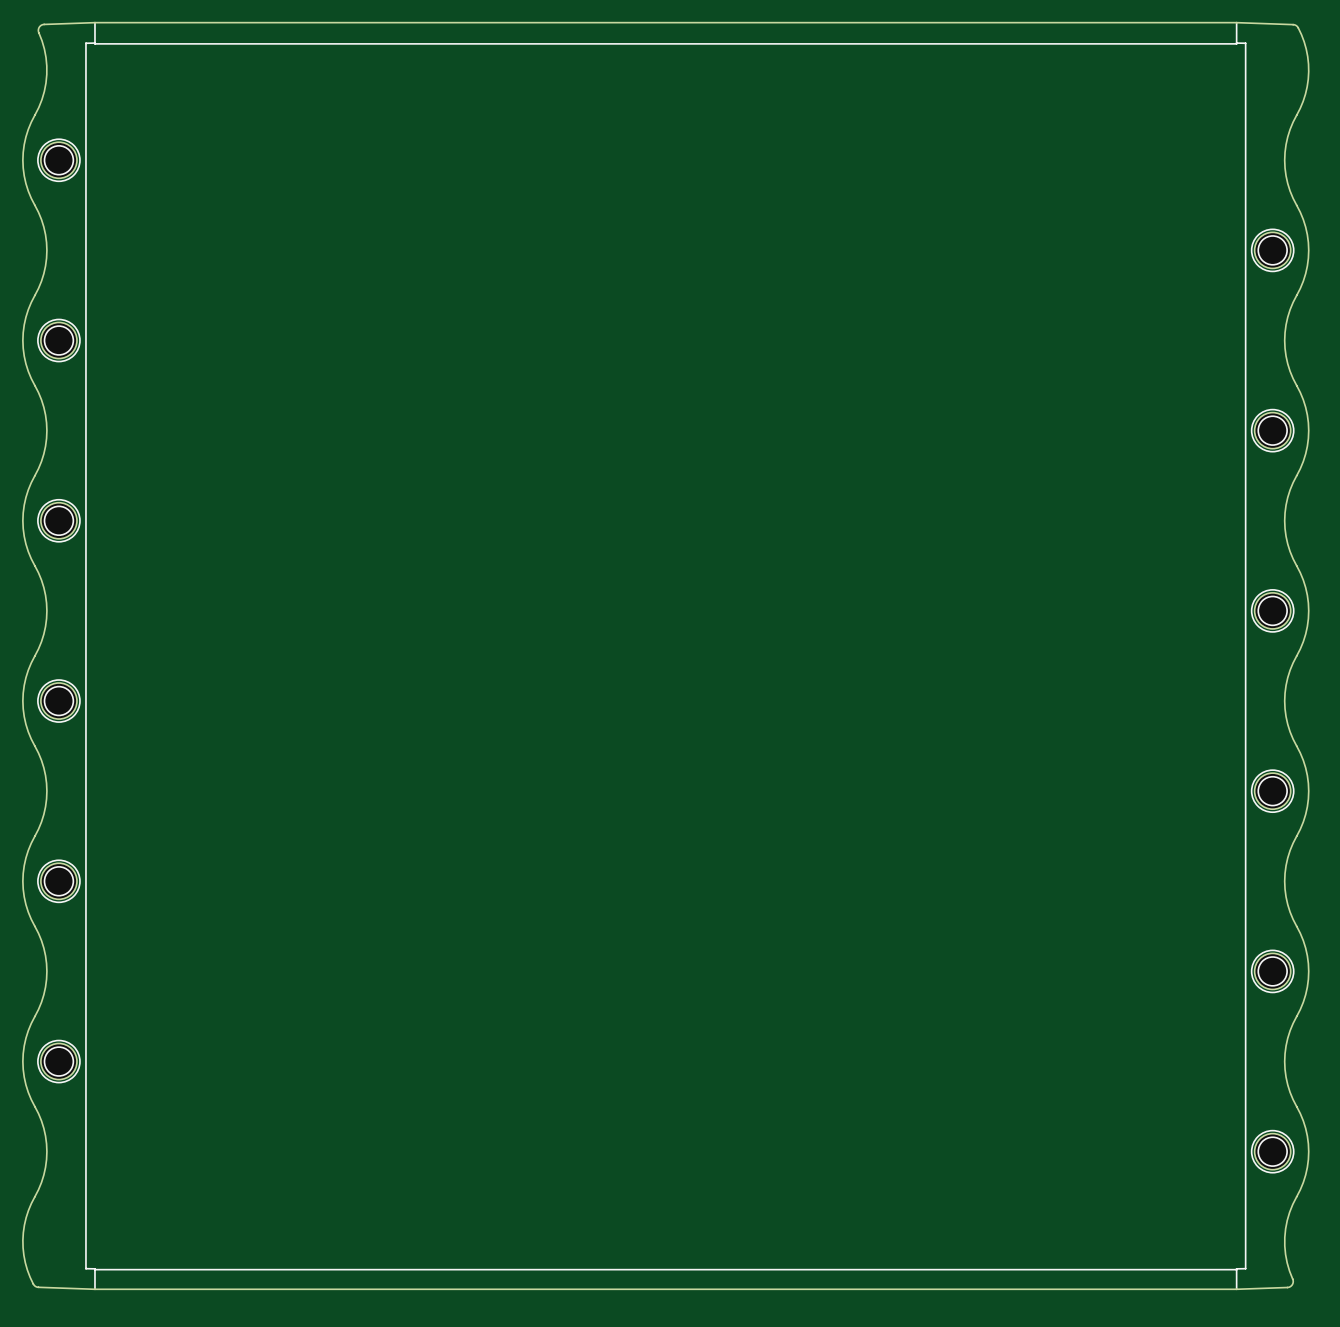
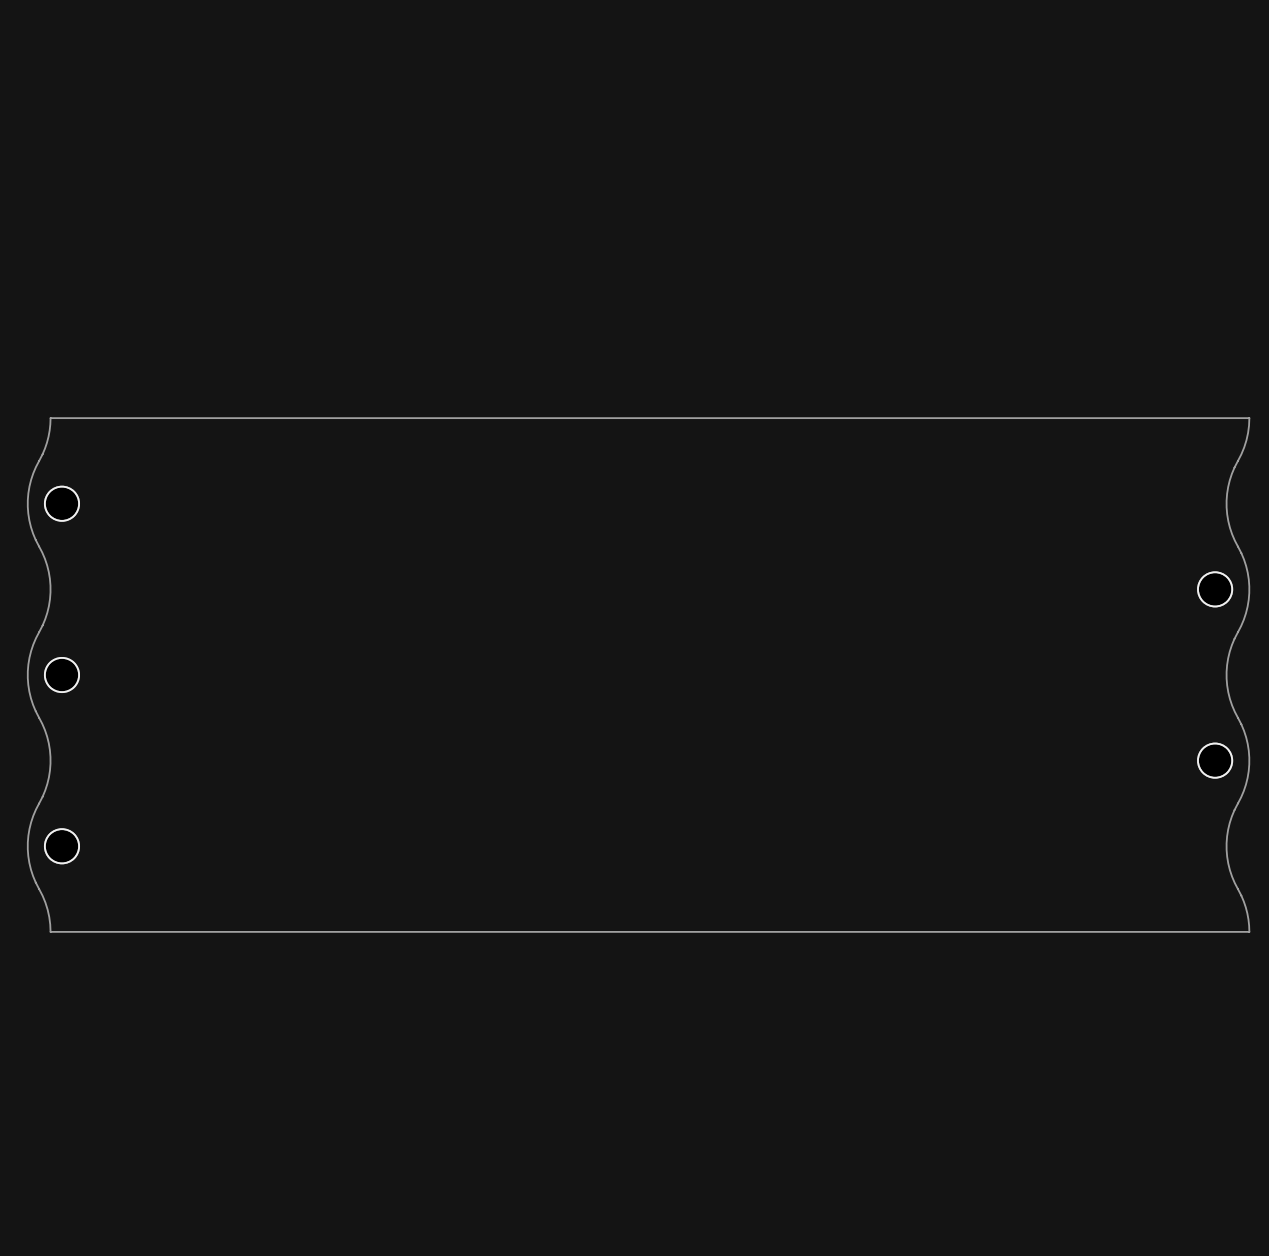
board edge: (94, 22) (44, 24) (39, 27) (38, 31) (46, 57) (45, 83) (41, 99) (28, 129) (23, 152) (25, 183) (41, 219) (46, 250) (43, 273) (28, 309) (22, 340) (25, 363) (41, 399) (46, 430) (43, 453) (28, 489) (22, 520) (25, 544) (41, 580) (46, 610) (41, 641) (25, 677) (22, 701) (25, 724) (41, 760) (46, 791) (43, 814) (28, 850) (22, 881) (25, 904) (41, 940) (46, 971) (43, 994) (28, 1030) (22, 1061) (25, 1084) (41, 1120) (46, 1143) (43, 1175) (28, 1210) (23, 1232) (25, 1262) (34, 1285) (94, 1289) (1236, 1289) (1291, 1285) (1293, 1280) (1285, 1254) (1285, 1228) (1289, 1212) (1305, 1175) (1308, 1151) (1305, 1128) (1290, 1092) (1284, 1061) (1287, 1038) (1303, 1002) (1308, 971) (1305, 948) (1290, 912) (1284, 881) (1287, 857) (1303, 821) (1308, 791) (1305, 767) (1290, 731) (1284, 701) (1290, 670) (1305, 634) (1308, 610) (1305, 587) (1290, 551) (1284, 520) (1287, 497) (1303, 461) (1308, 430) (1305, 407) (1290, 371) (1284, 340) (1287, 317) (1303, 281) (1308, 250) (1305, 227) (1290, 191) (1285, 168) (1287, 136) (1303, 101) (1308, 79) (1306, 49) (1297, 26) (1236, 22) (94, 22) -> none
line: (94, 22) (94, 43) (1236, 43) (1236, 22) -> none
line: (94, 43) (85, 43) (85, 1268) (94, 1268) (94, 1289) -> none
line: (1236, 43) (1245, 43) (1245, 1268) (1236, 1268) (1236, 1289) -> none
drawing: [37, 139, 80, 182] -> none
hole: (58, 160) -> none
drawing: [1251, 229, 1294, 272] -> none
hole: (1272, 250) -> none
drawing: [37, 319, 80, 362] -> none
hole: (58, 340) -> none
drawing: [1251, 409, 1294, 452] -> none
board edge: none -> (50, 418) (1249, 418) (1246, 440) (1231, 473) (1226, 500) (1229, 527) (1244, 559) (1249, 586) (1245, 613) (1231, 645) (1227, 665) (1228, 692) (1246, 737) (1249, 757) (1245, 784) (1229, 822) (1226, 850) (1232, 876) (1245, 907) (1249, 931) (50, 931) (47, 909) (33, 876) (27, 849) (31, 822) (45, 790) (50, 763) (47, 736) (33, 704) (28, 684) (29, 657) (47, 612) (50, 592) (47, 565) (30, 527) (27, 500) (33, 473) (46, 442) (50, 418)
hole: (1272, 430) -> none
drawing: [37, 499, 80, 542] -> none
drawing: none -> [44, 486, 80, 521]
drawing: [1251, 589, 1294, 632] -> none
drawing: none -> [1197, 572, 1233, 607]
drawing: [37, 680, 80, 723] -> none
drawing: none -> [44, 657, 80, 693]
drawing: [1251, 770, 1294, 813] -> none
drawing: none -> [1197, 743, 1233, 778]
drawing: [37, 860, 80, 903] -> none
drawing: none -> [44, 829, 80, 864]
drawing: [1251, 950, 1294, 993] -> none
hole: (1272, 971) -> none
drawing: [37, 1040, 80, 1083] -> none
hole: (58, 1061) -> none
drawing: [1251, 1130, 1294, 1173] -> none
hole: (1272, 1151) -> none
line: (94, 1269) (1236, 1269) -> none

